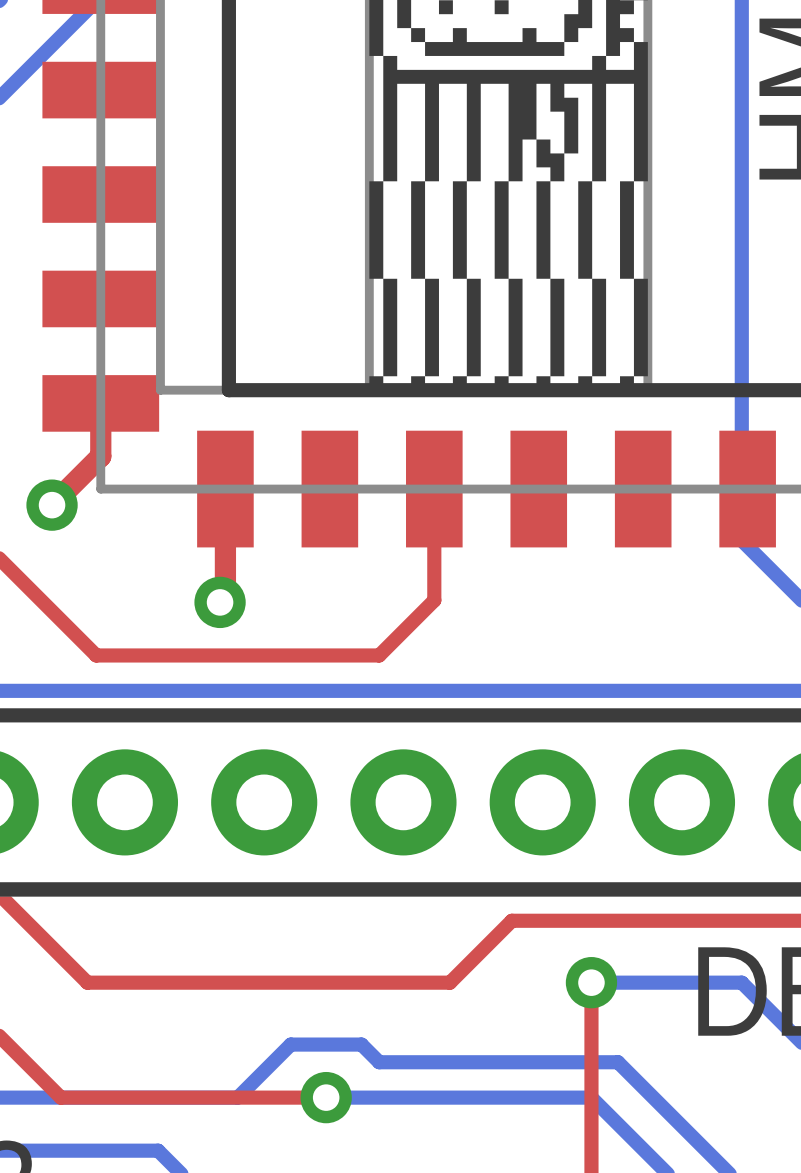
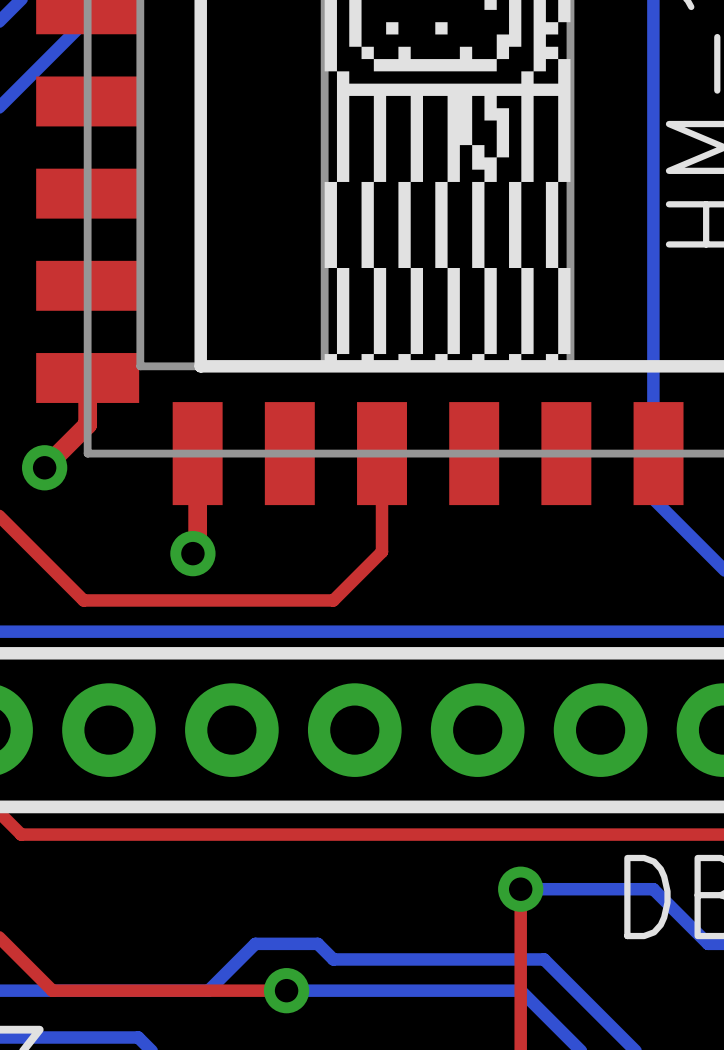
top track: (25, 920) (87, 982) (449, 982) (511, 920) -> (21, 834) (450, 834)

